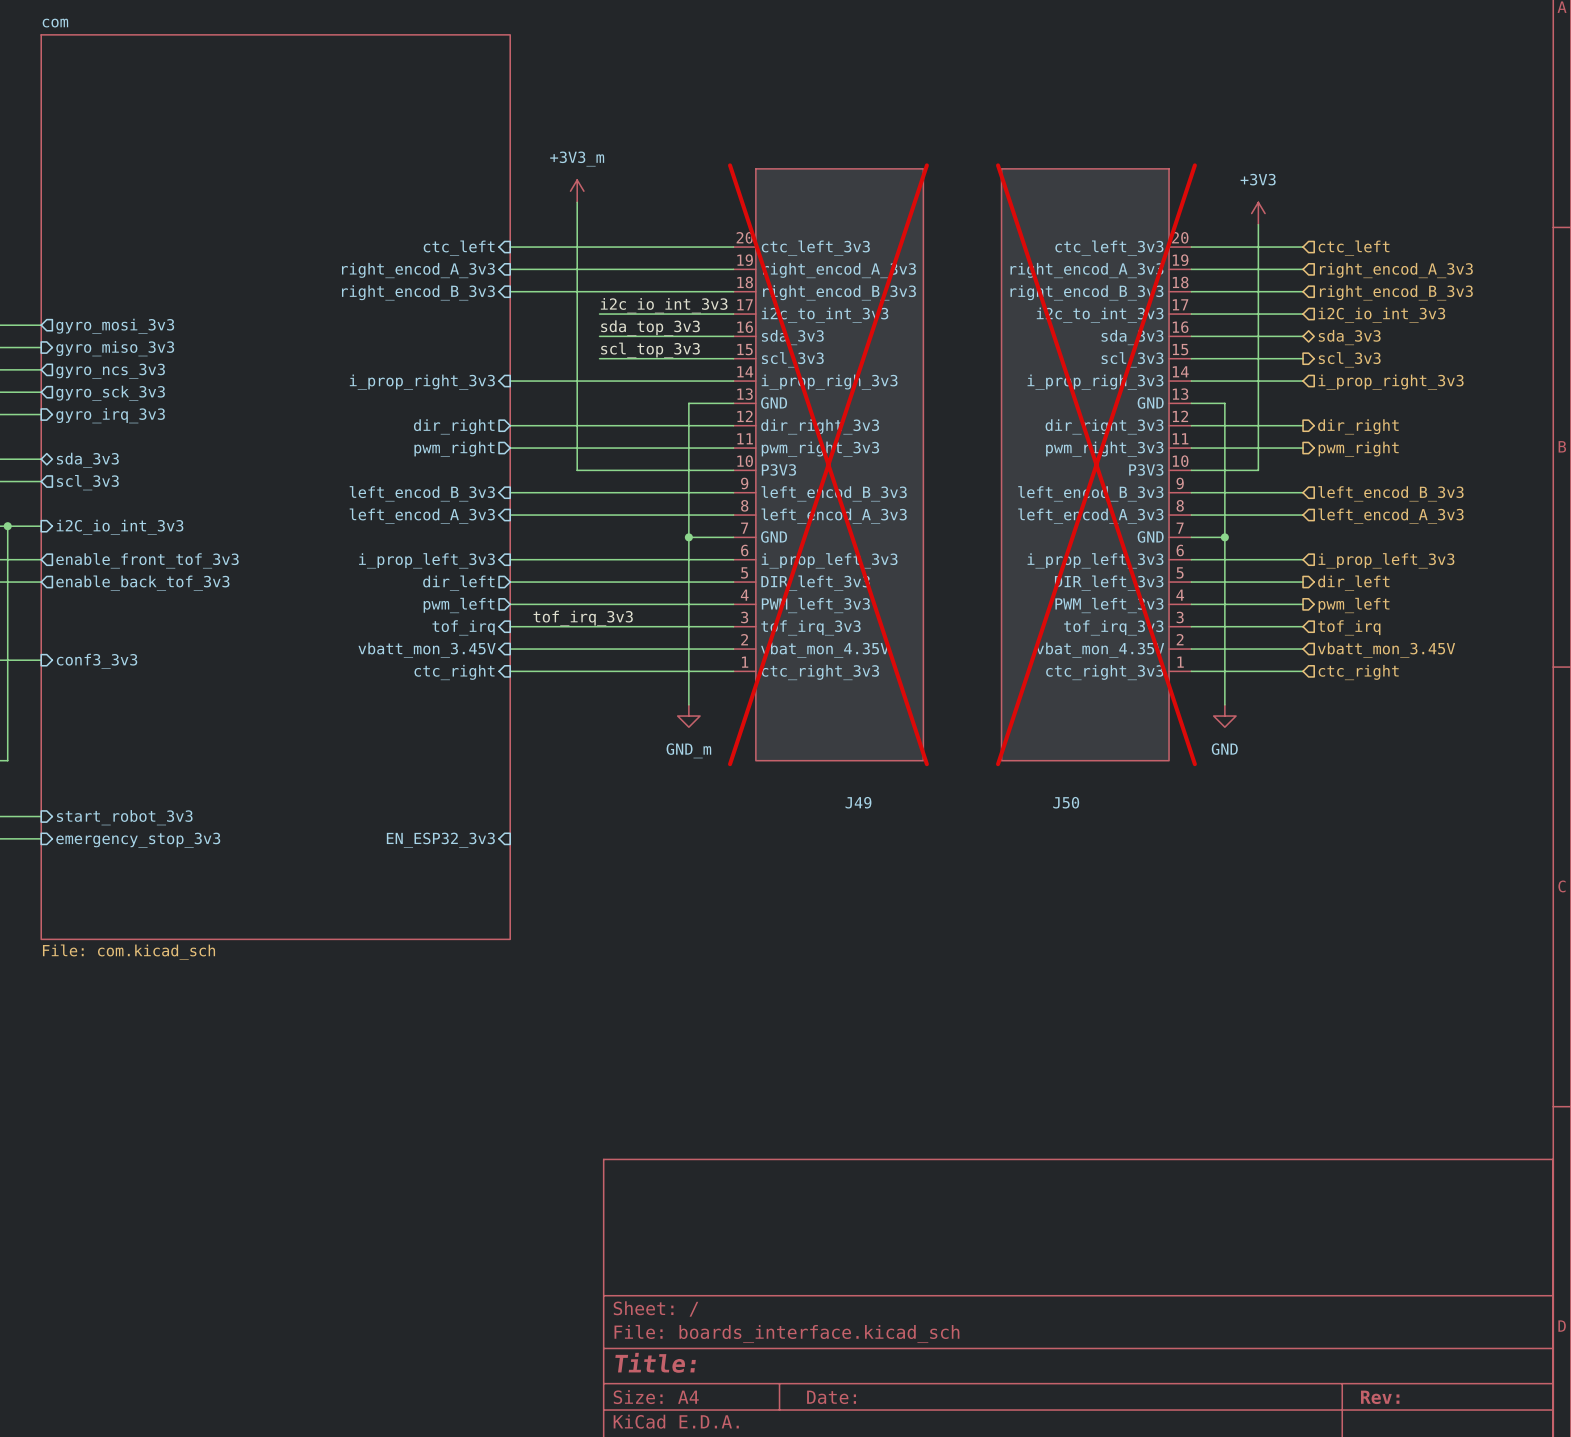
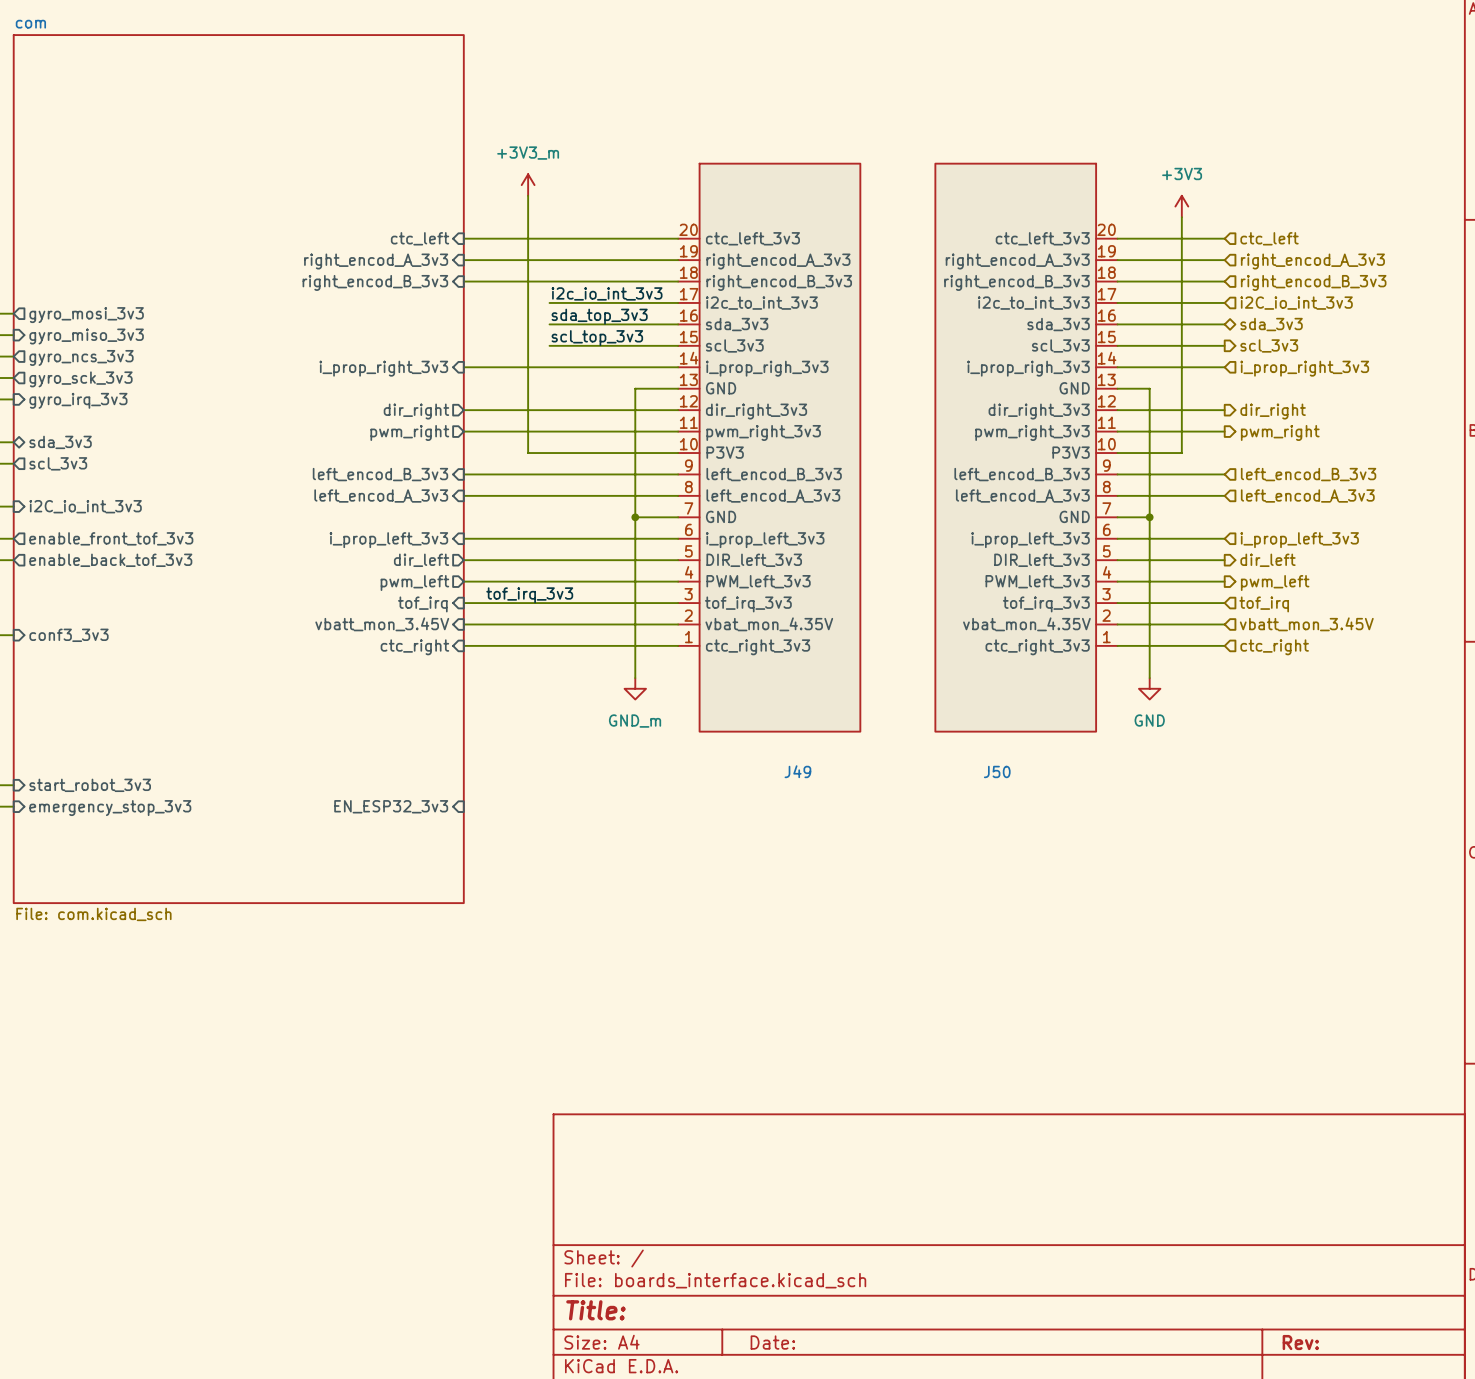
J49 do-not-place cross: (828, 464) -> none
J50 do-not-place cross: (1096, 464) -> none

